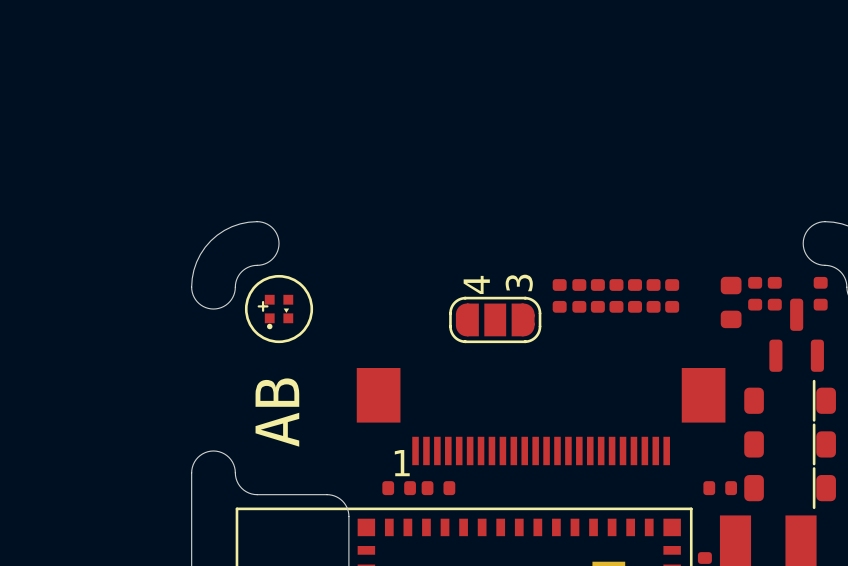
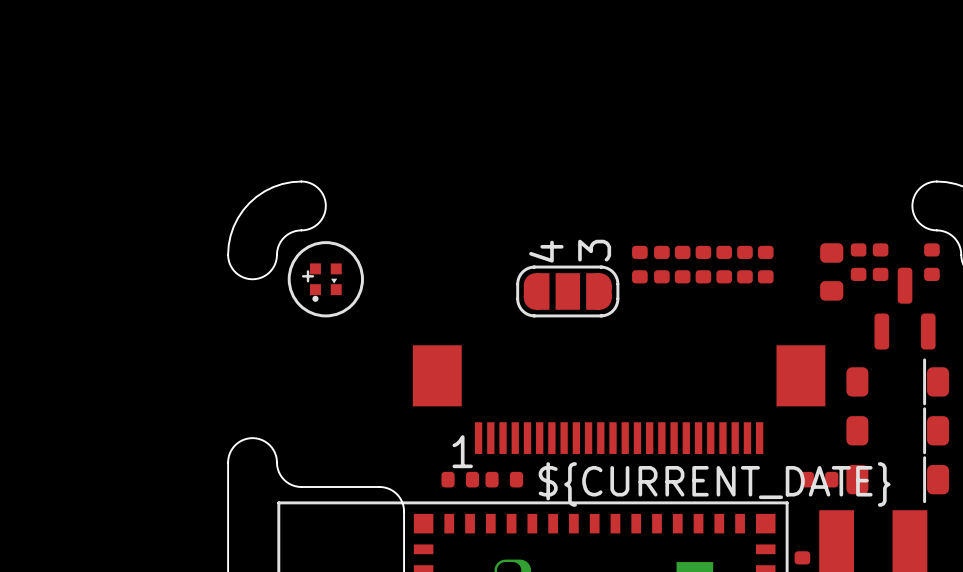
text: AB (277, 412) -> none
text: none -> ${CURRENT_DATE} (714, 484)

